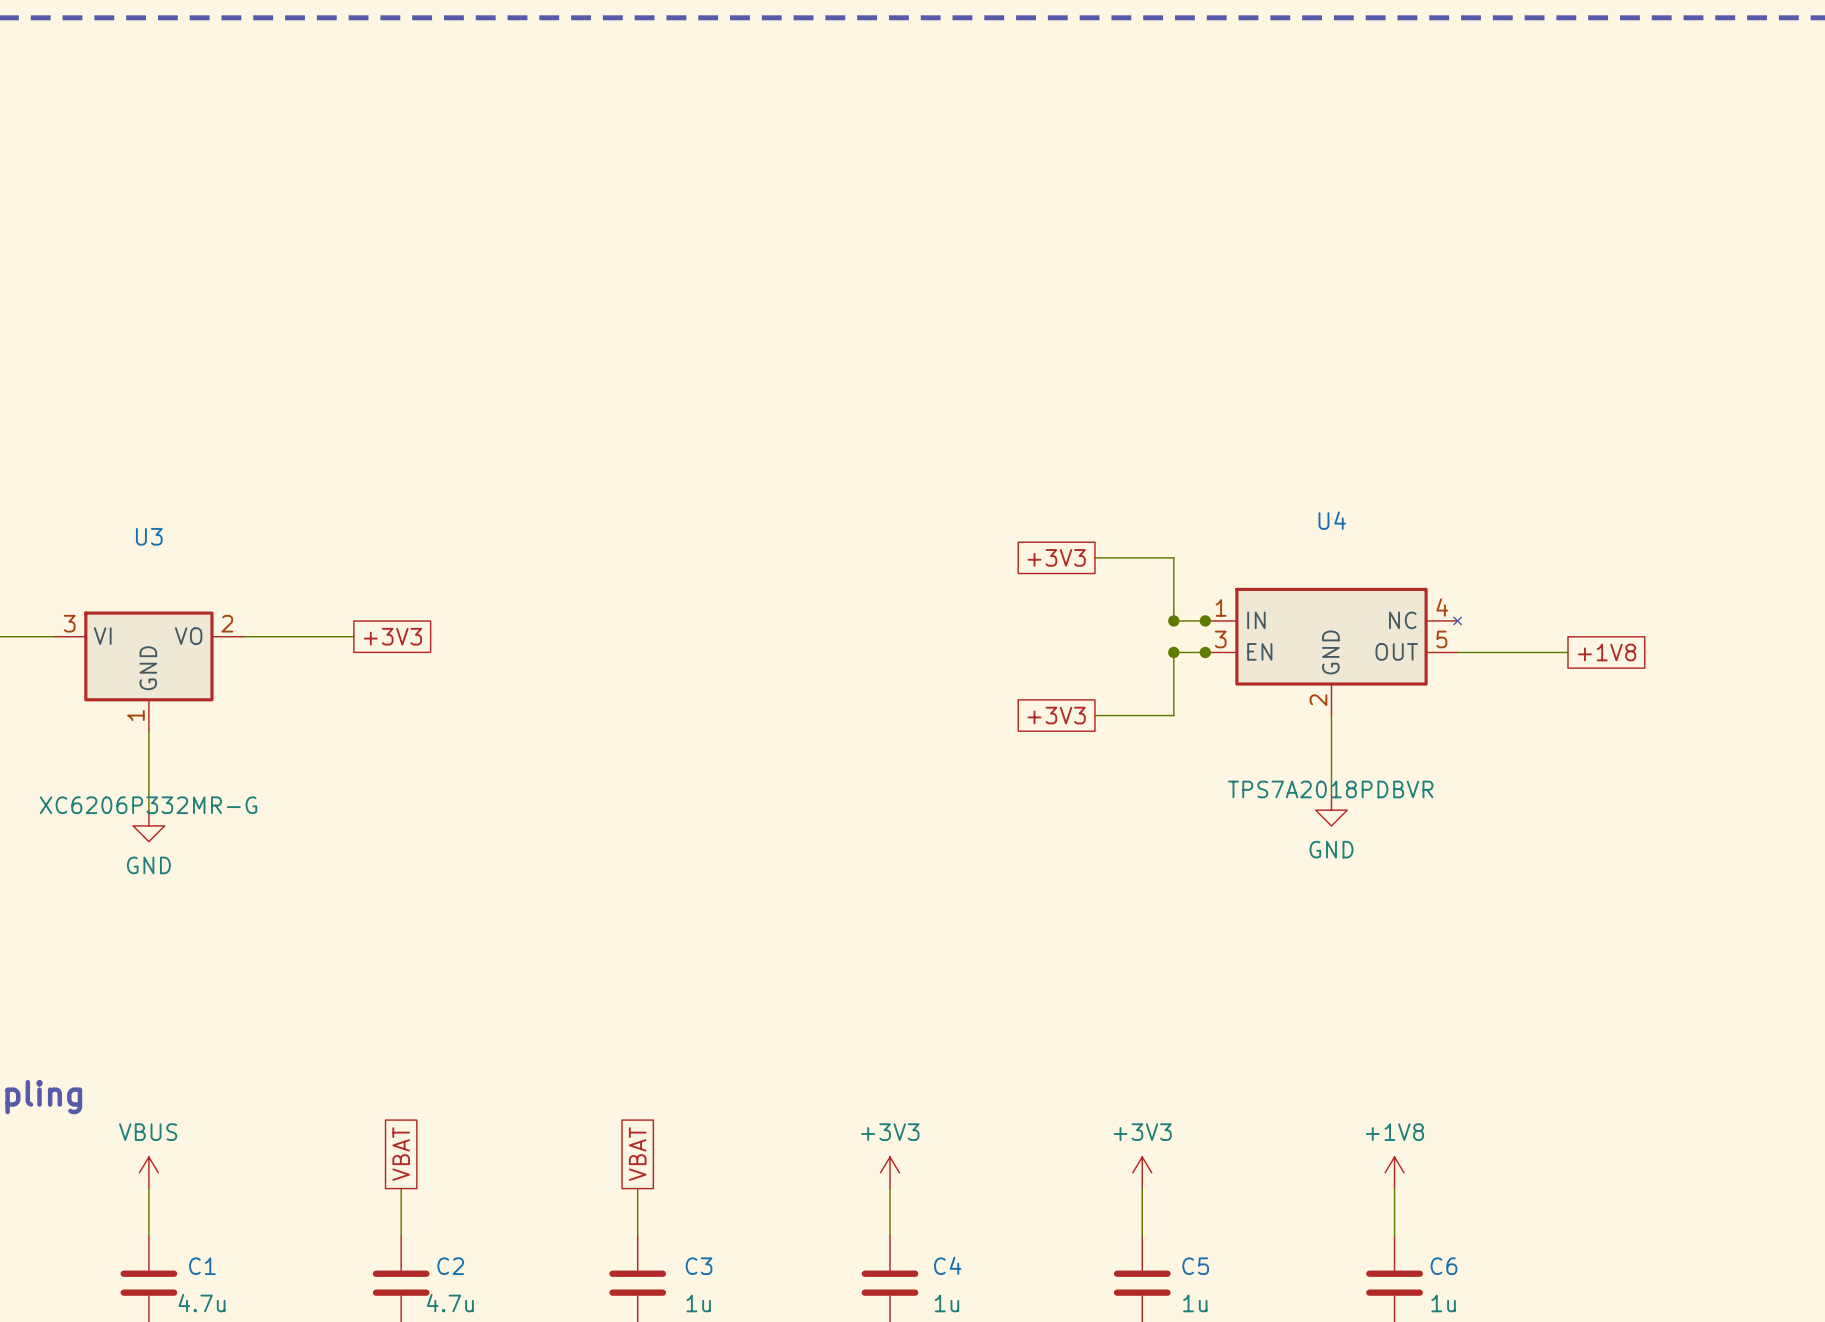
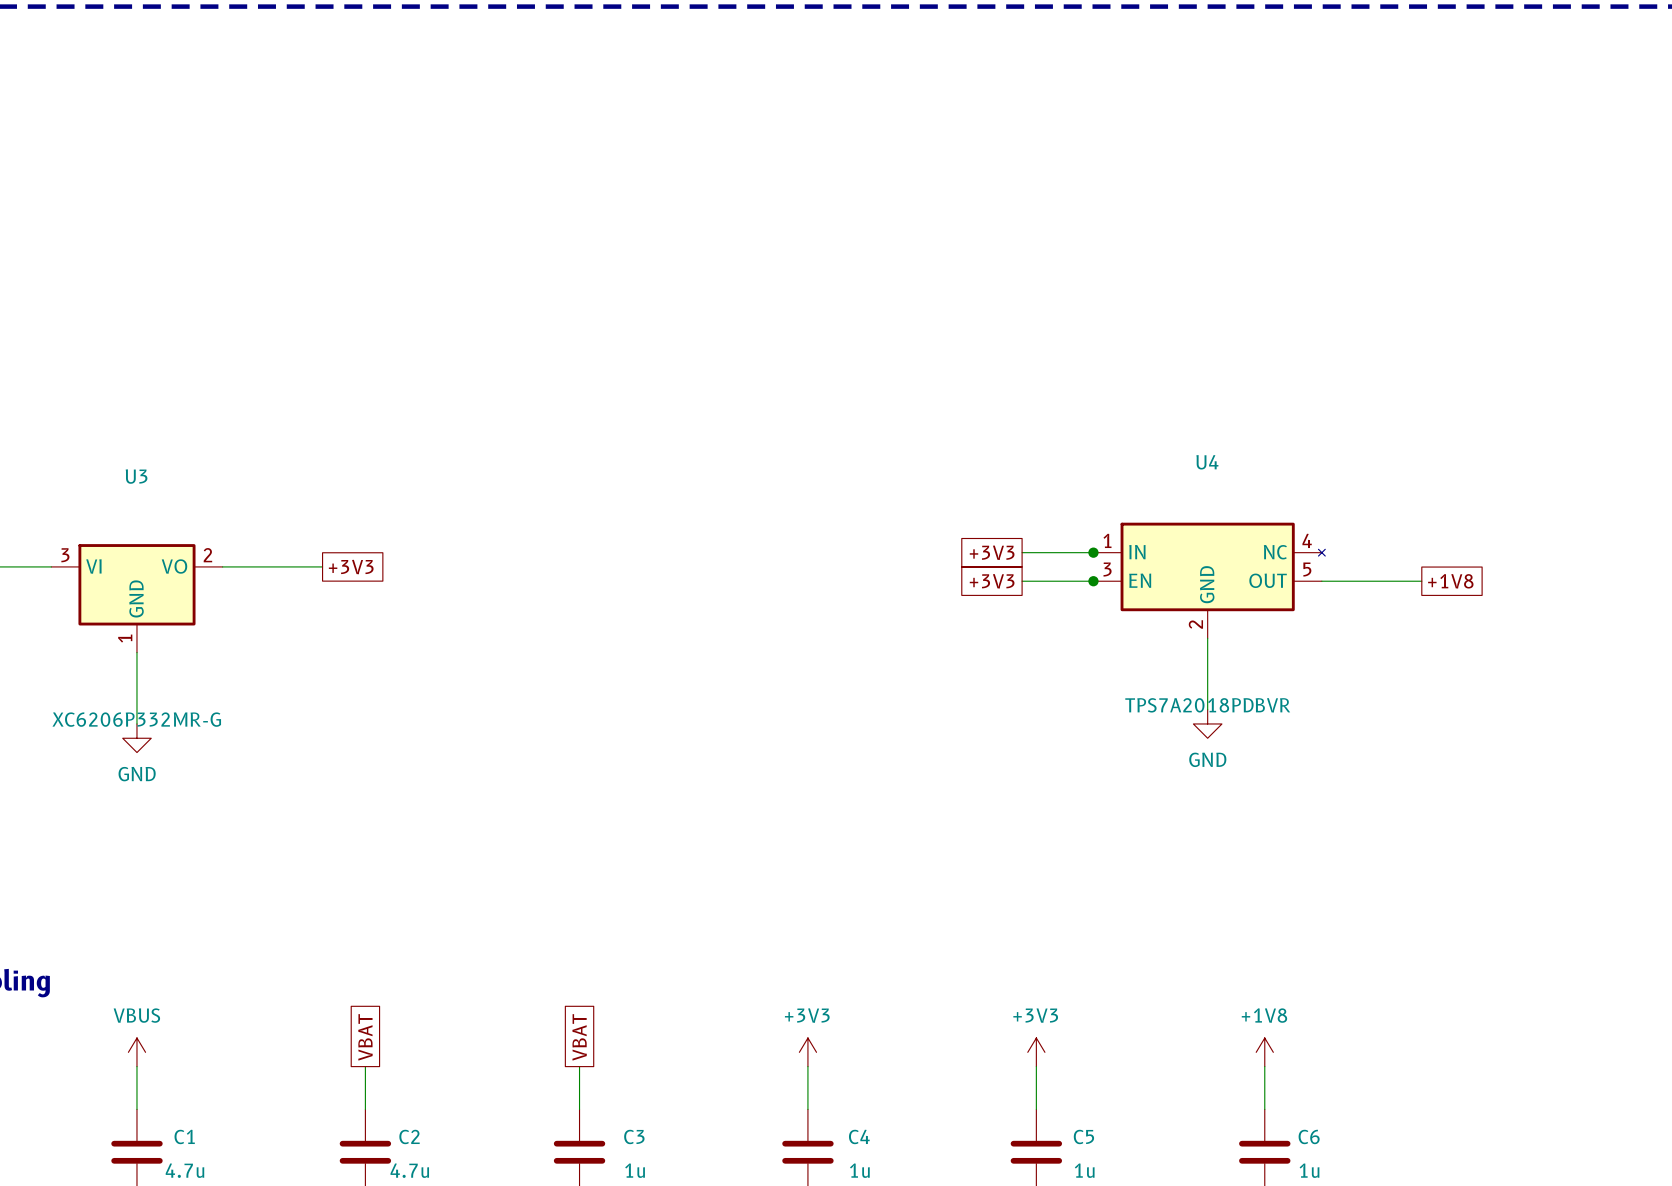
global label: +3V3 (1056, 557) -> none
wire: (1094, 557) (1173, 557) (1173, 620) -> (1022, 552) (1064, 552)
global label: none -> +3V3 (992, 552)
junction: (1173, 620) -> none
global label: none -> +3V3 (992, 581)
wire: (1173, 652) (1173, 715) (1094, 715) -> (1064, 581) (1022, 581)
junction: (1173, 652) -> none
global label: +3V3 (1056, 715) -> none

